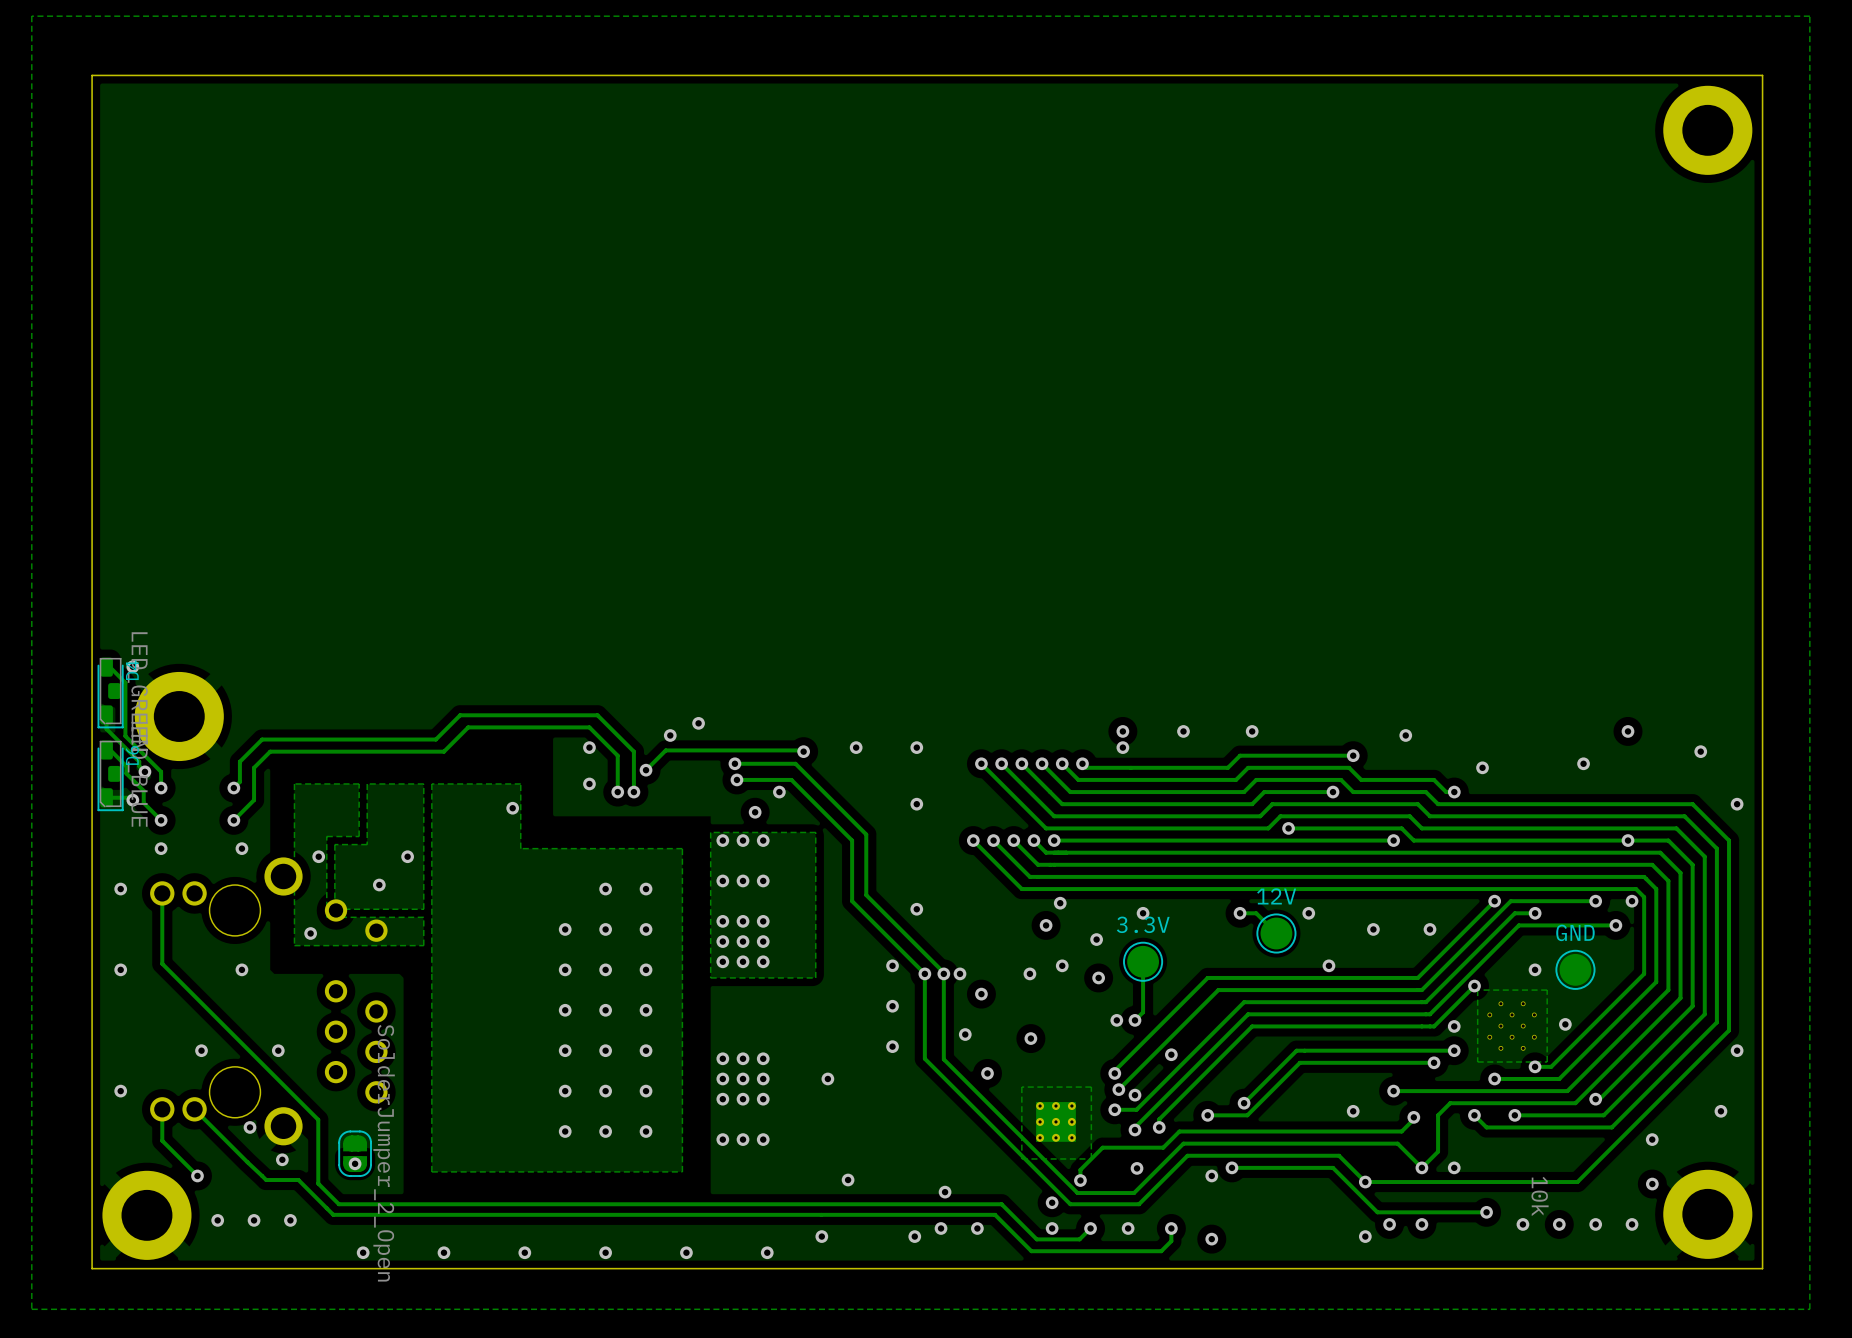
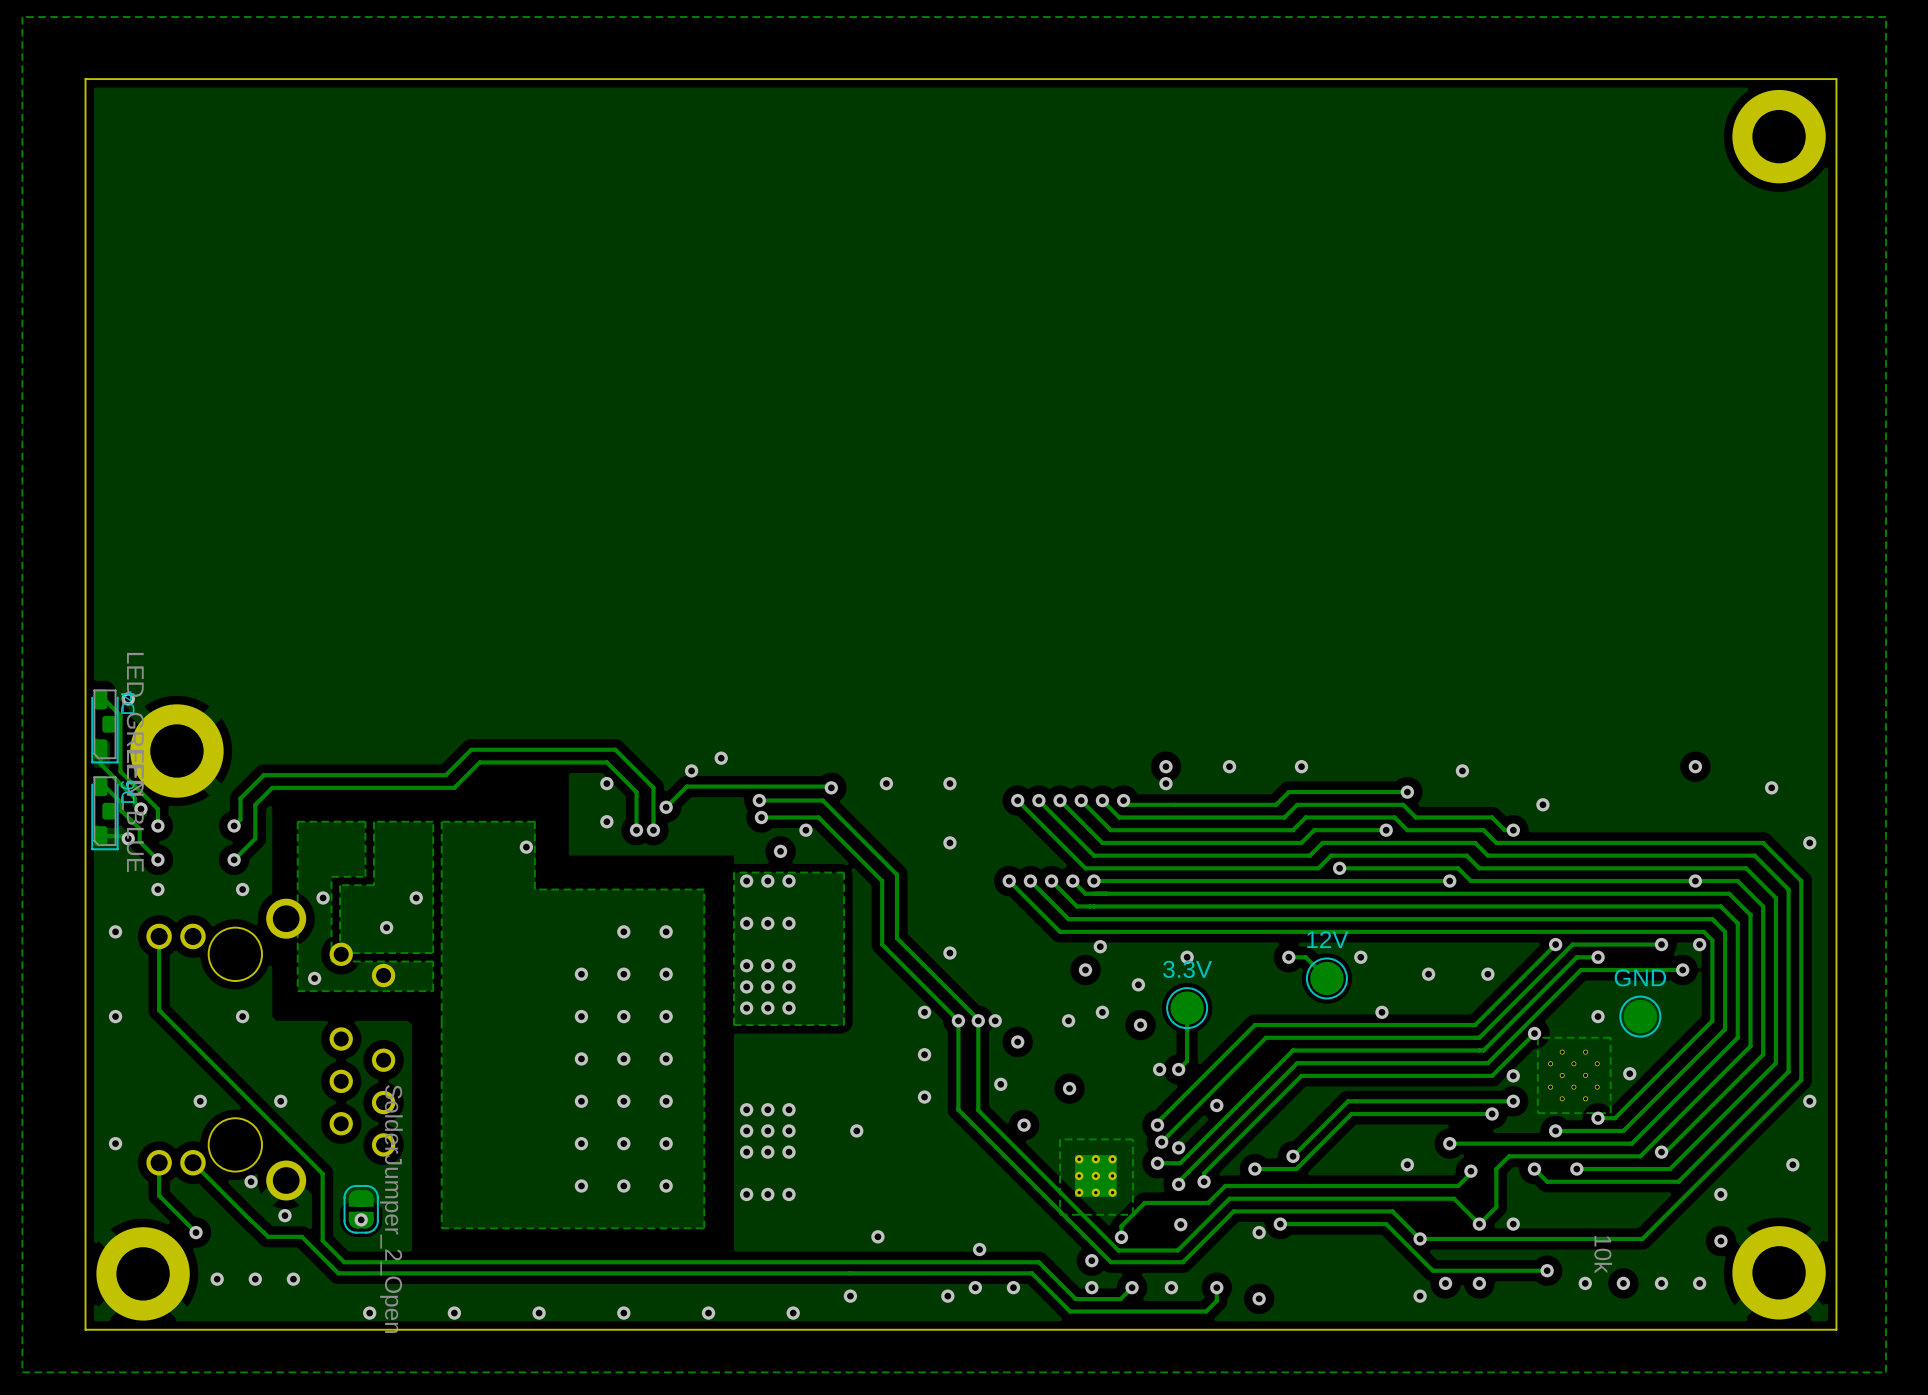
via: (1583, 763) -> none

